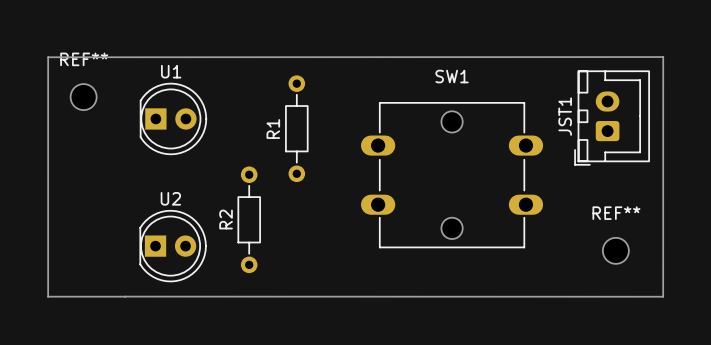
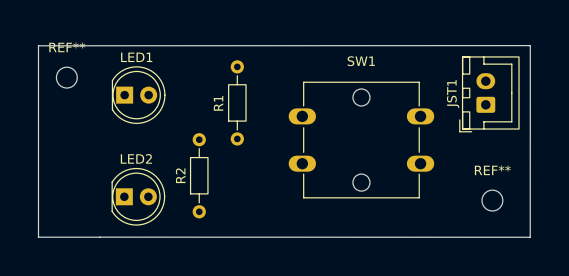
U1 name: U1 (171, 71) -> LED1 (136, 57)
U2 name: U2 (170, 198) -> LED2 (136, 158)

